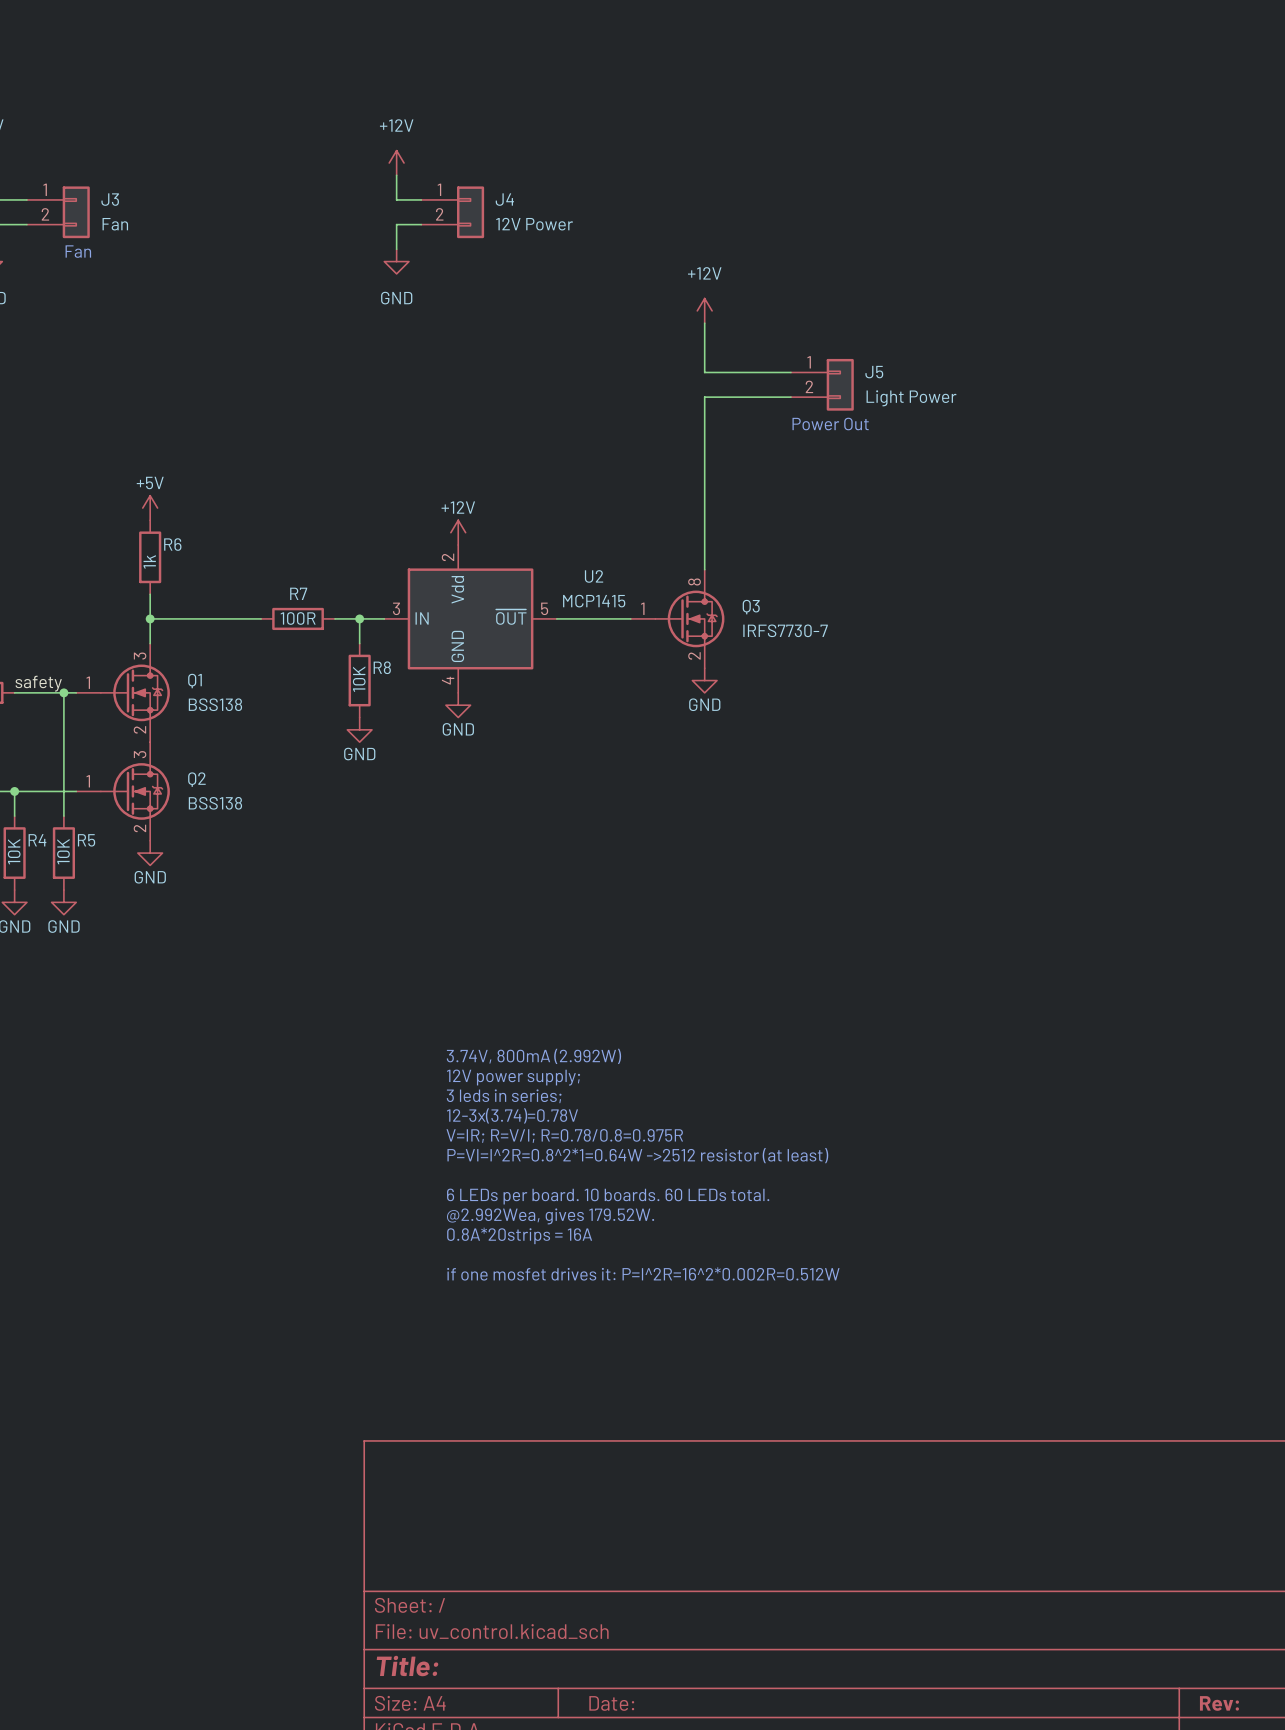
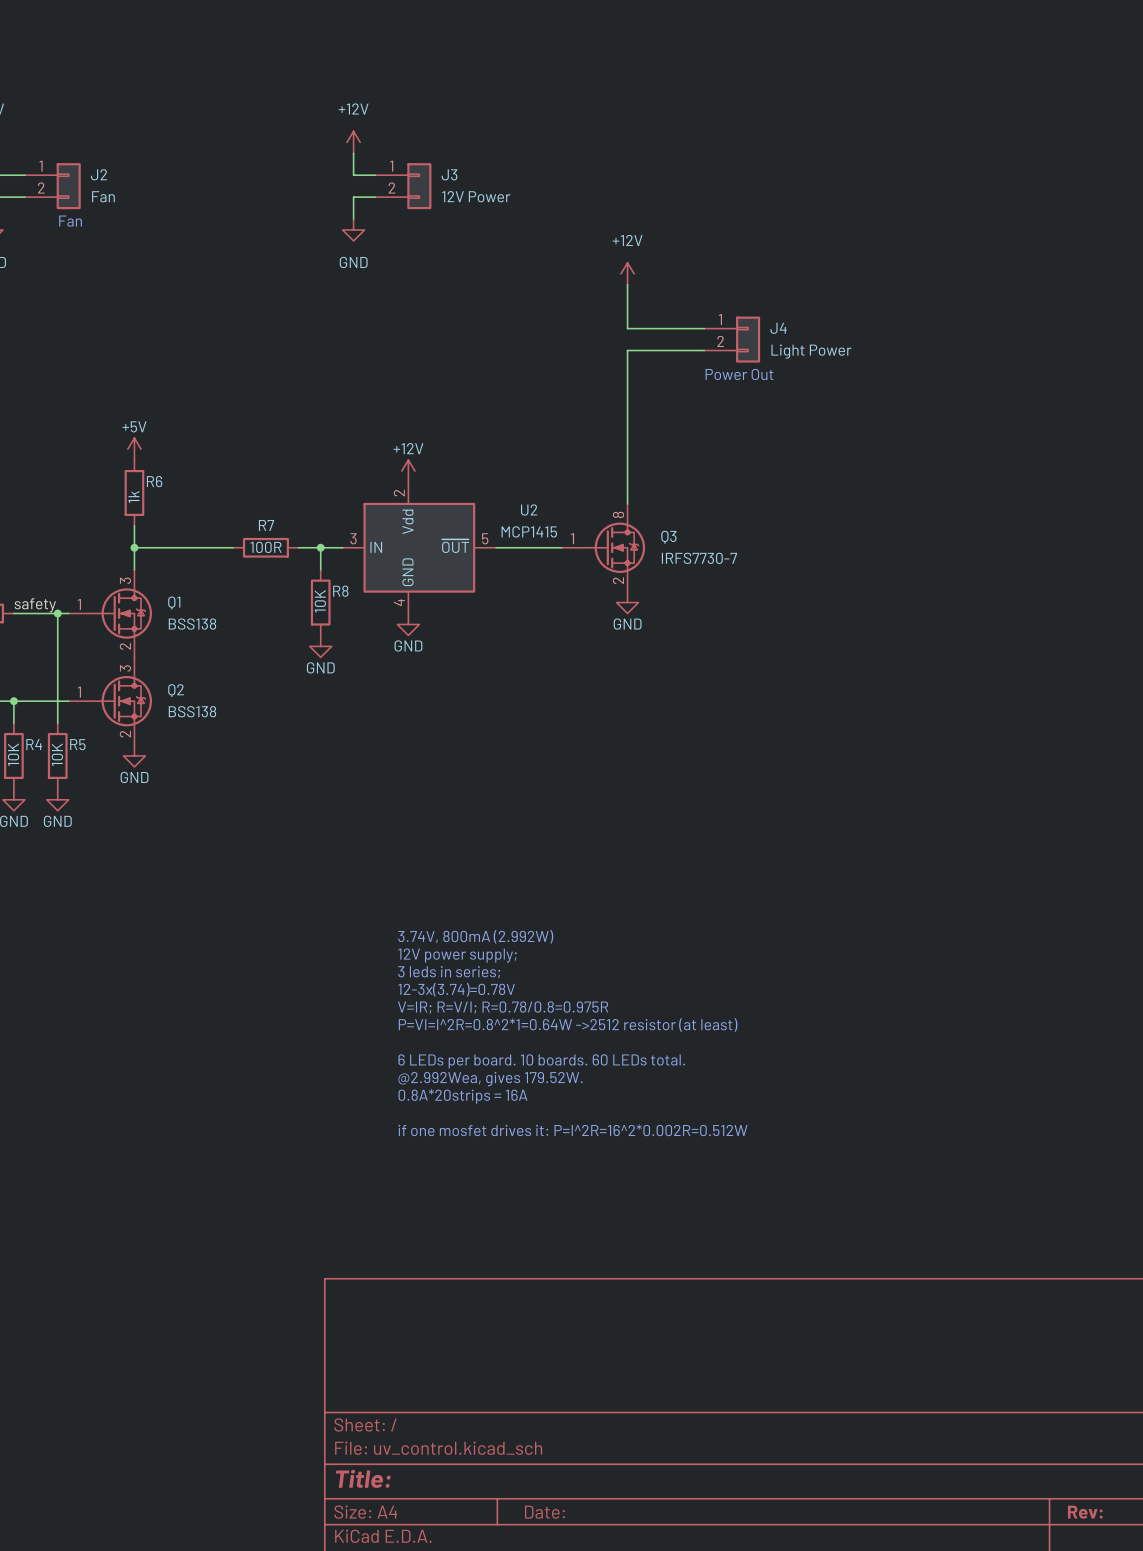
J3 name: J3 (110, 199) -> J2 (99, 174)
J4 name: J4 (504, 199) -> J3 (449, 174)
J5 name: J5 (874, 372) -> J4 (778, 328)

